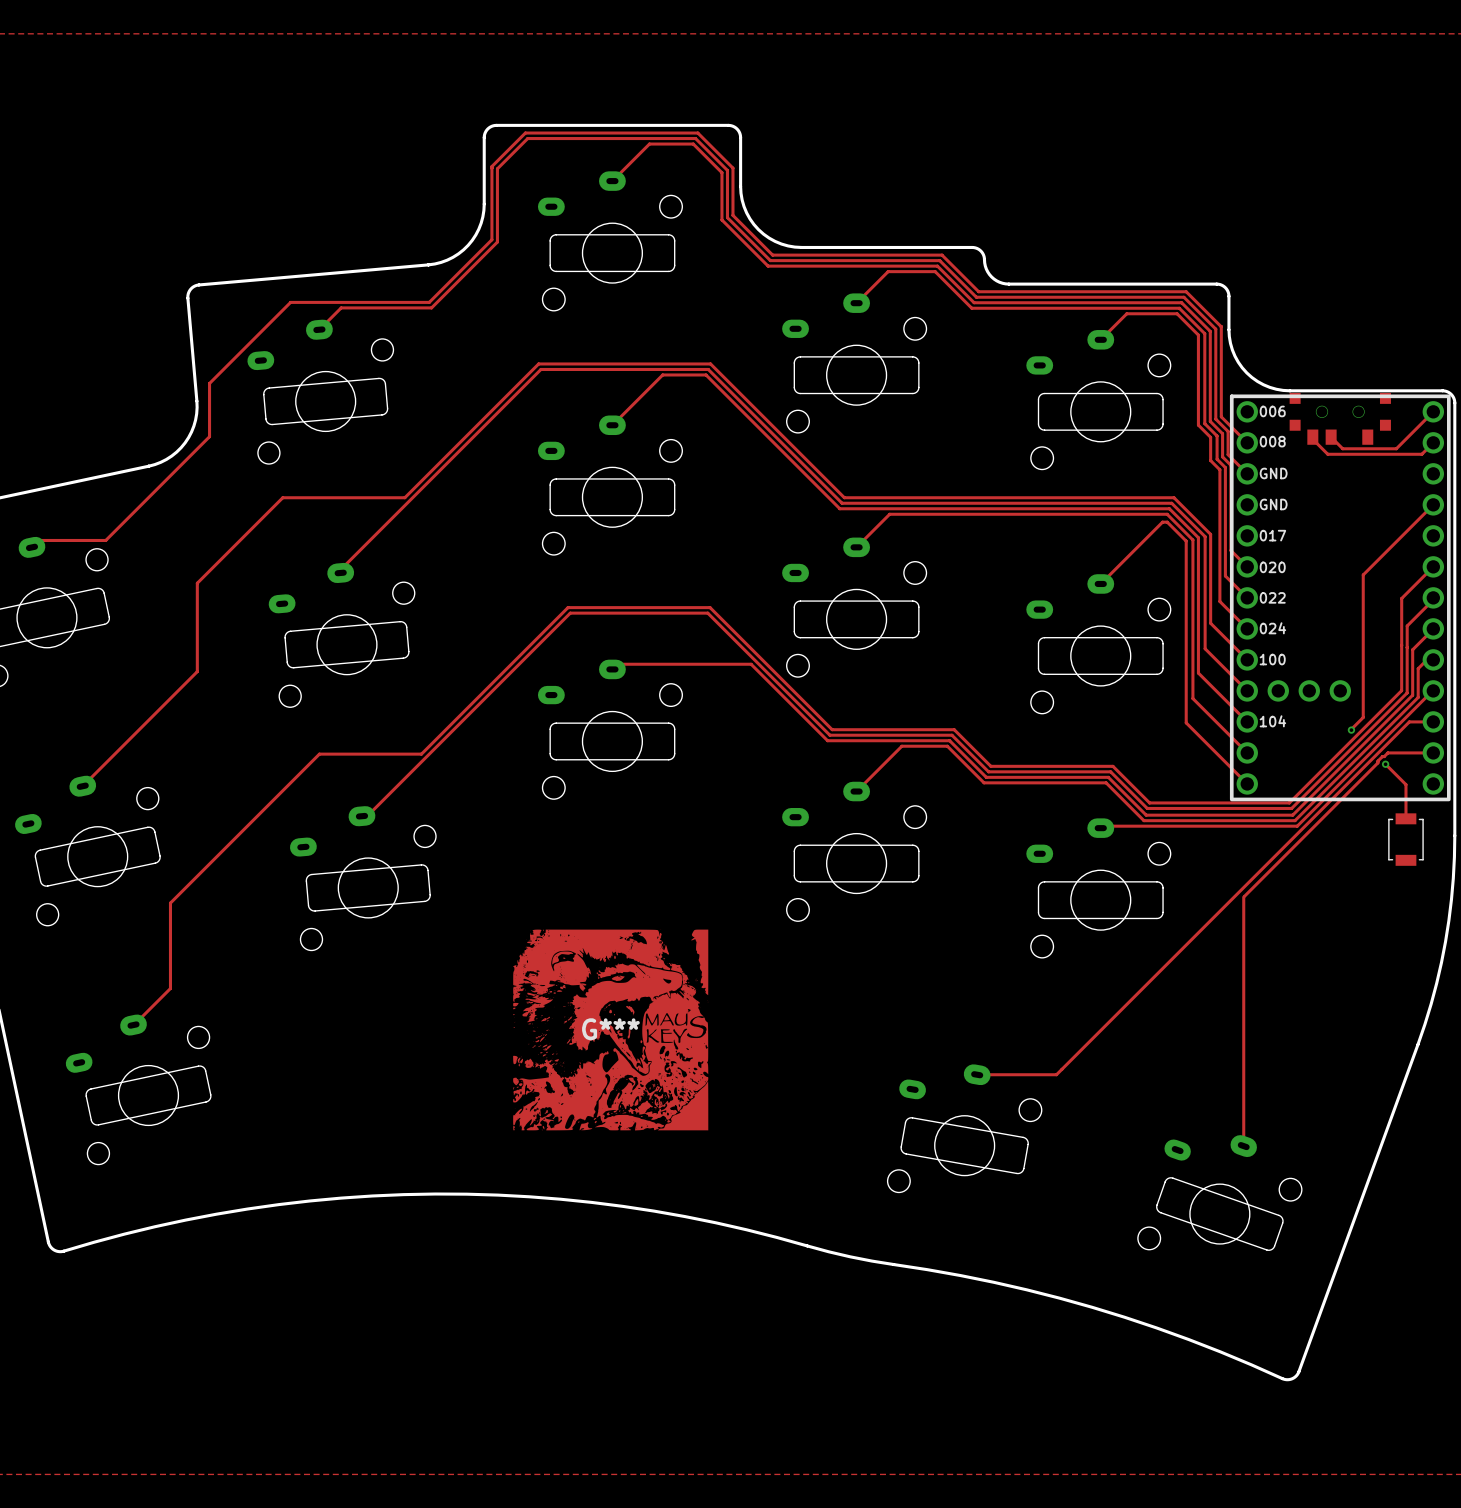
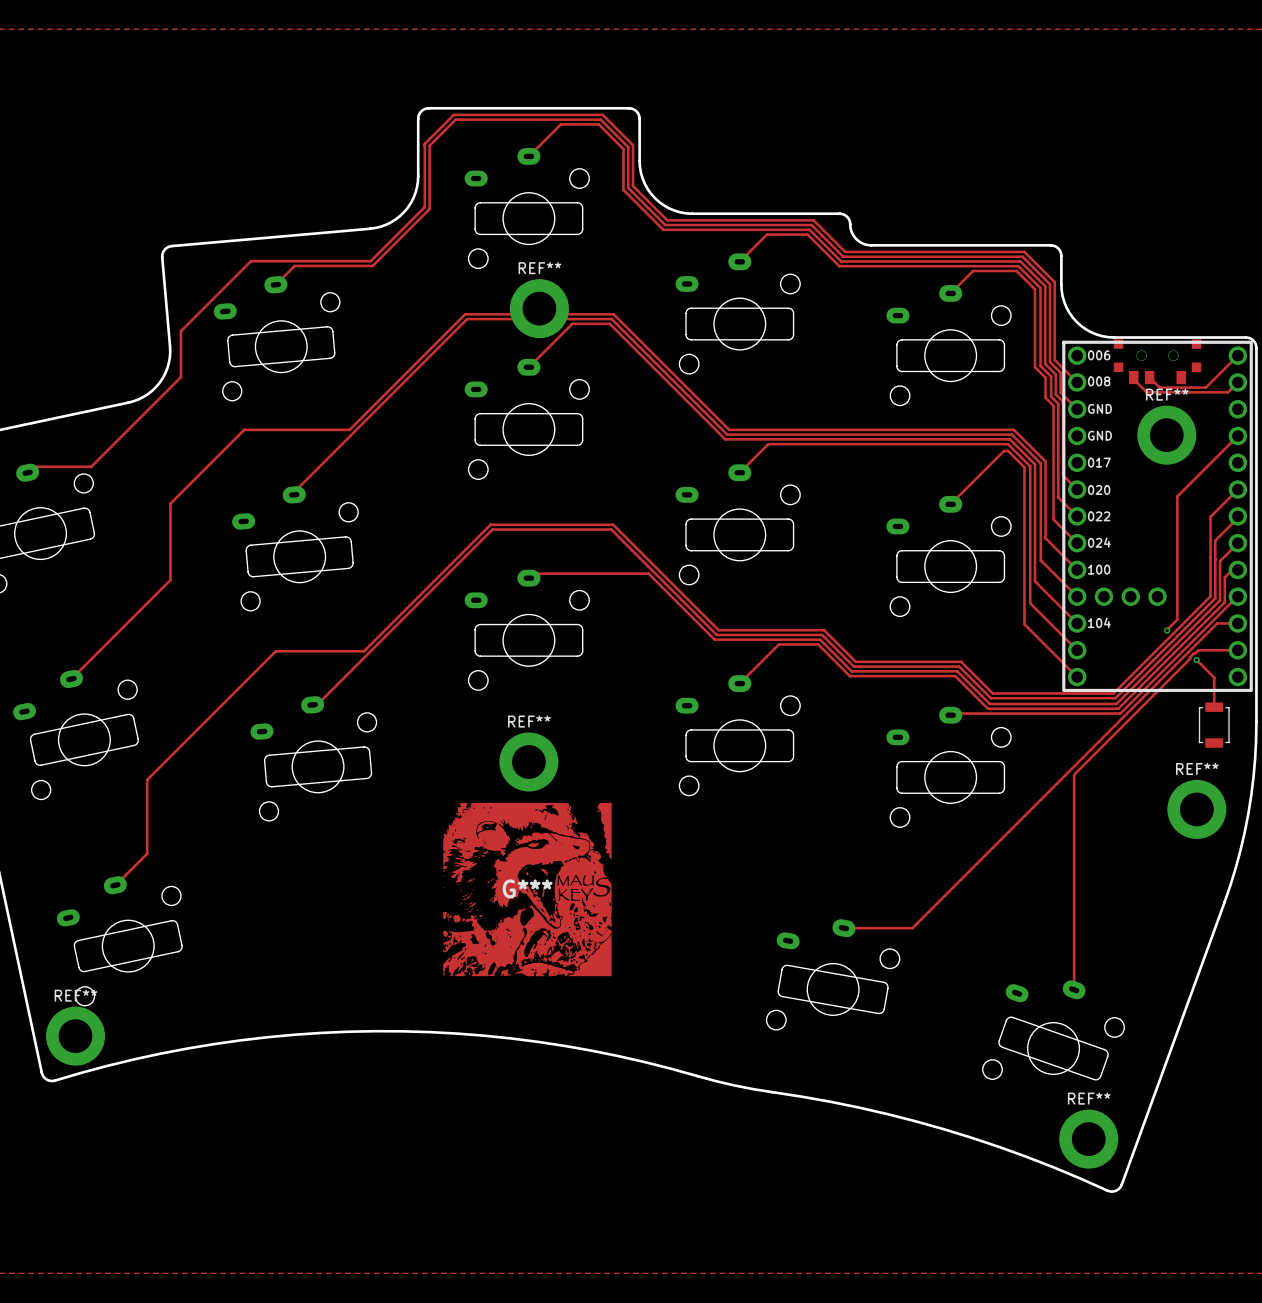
REF**: none -> (539, 308)
REF**: none -> (1166, 435)
REF**: none -> (528, 762)
REF**: none -> (1196, 809)
REF**: none -> (75, 1036)
REF**: none -> (1088, 1139)

